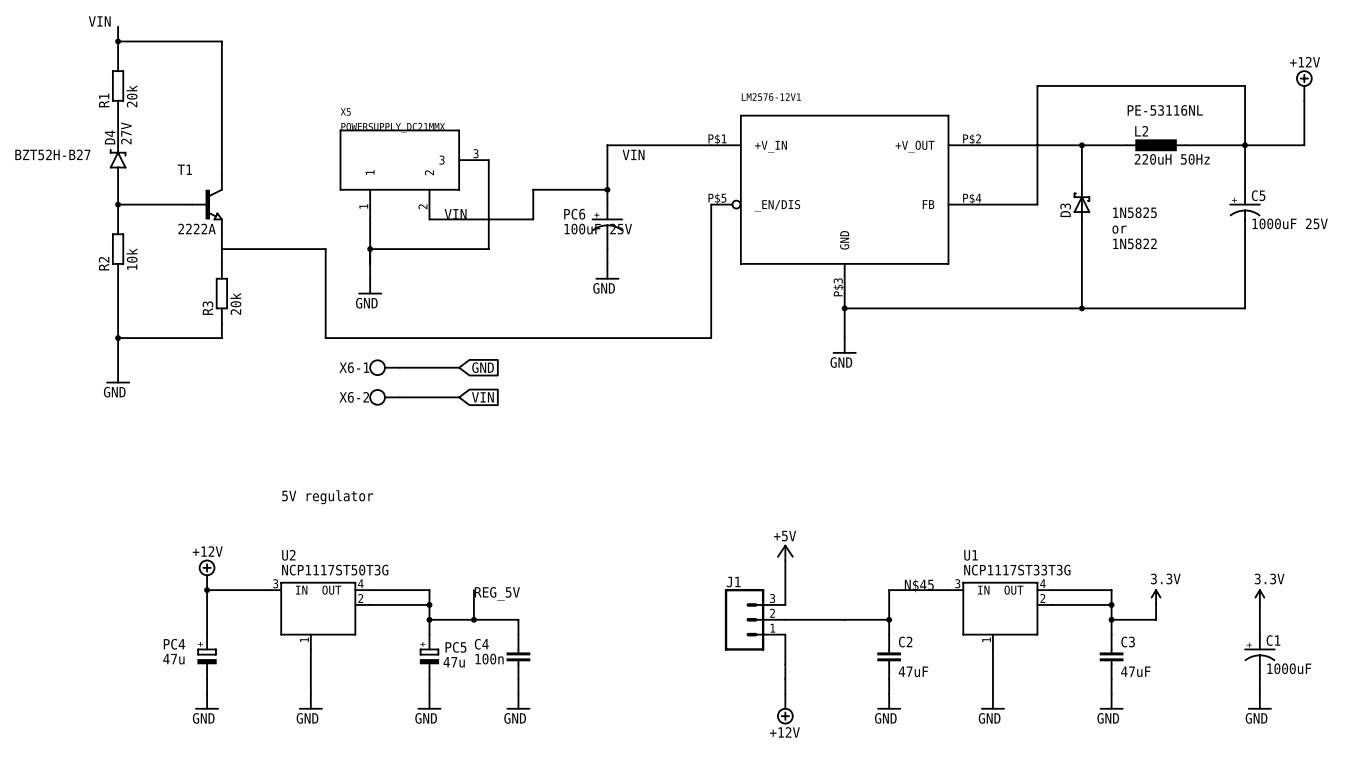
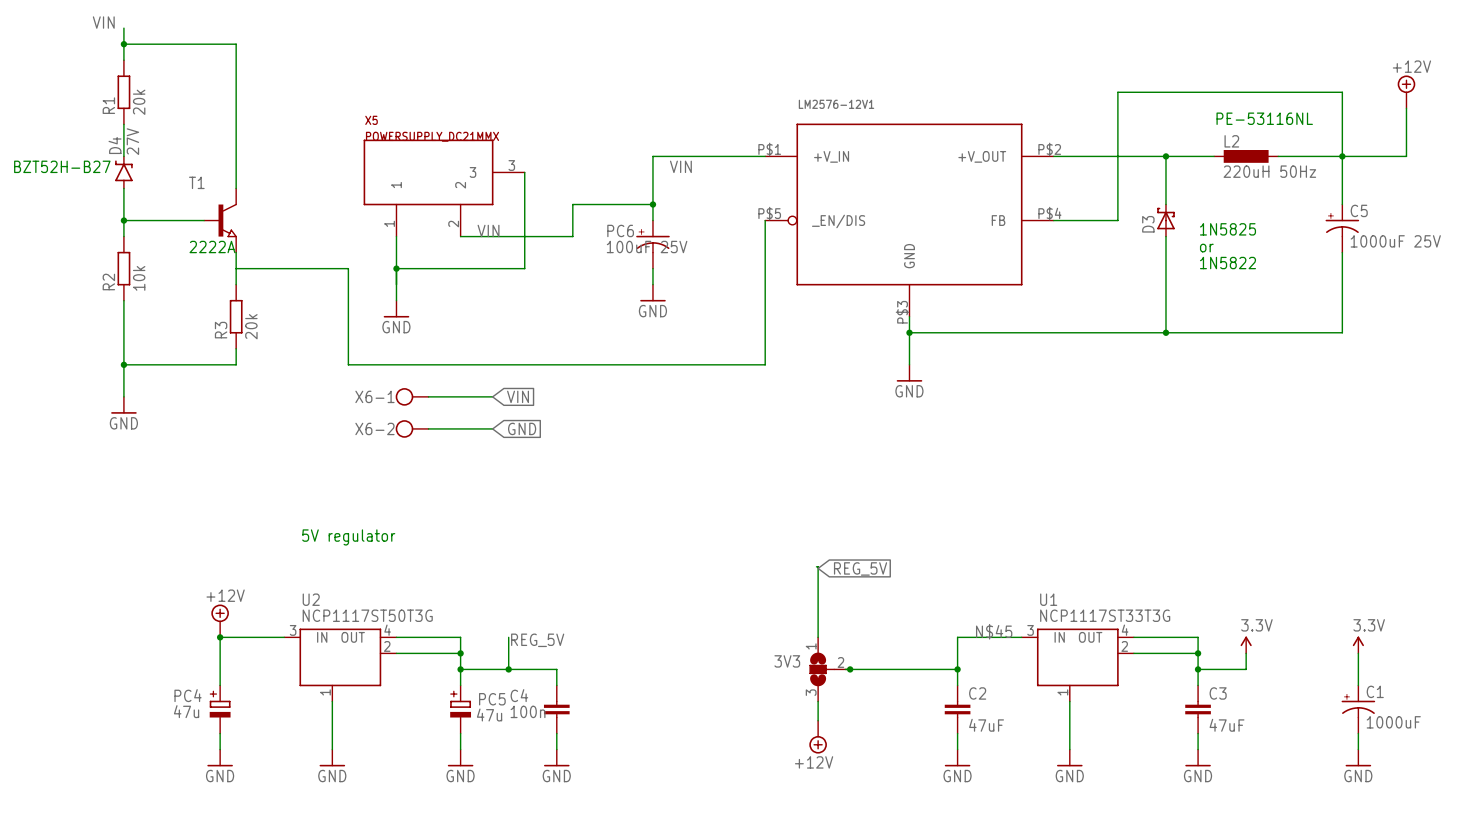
global label: GND (483, 367) -> VIN (518, 396)
global label: VIN (482, 397) -> GND (522, 428)
wire: none -> (816, 566) (818, 566) (818, 637)
global label: none -> REG_5V (860, 568)
power symbol: +5V (785, 552) -> none
wire: (785, 560) (785, 604) -> none
J1: (755, 619) -> none
3V3: none -> (829, 669)
junction: none -> (850, 669)
wire: (785, 634) (785, 693) -> none
wire: none -> (818, 701) (818, 720)
power symbol position: +12V (785, 709) -> +12V (818, 737)

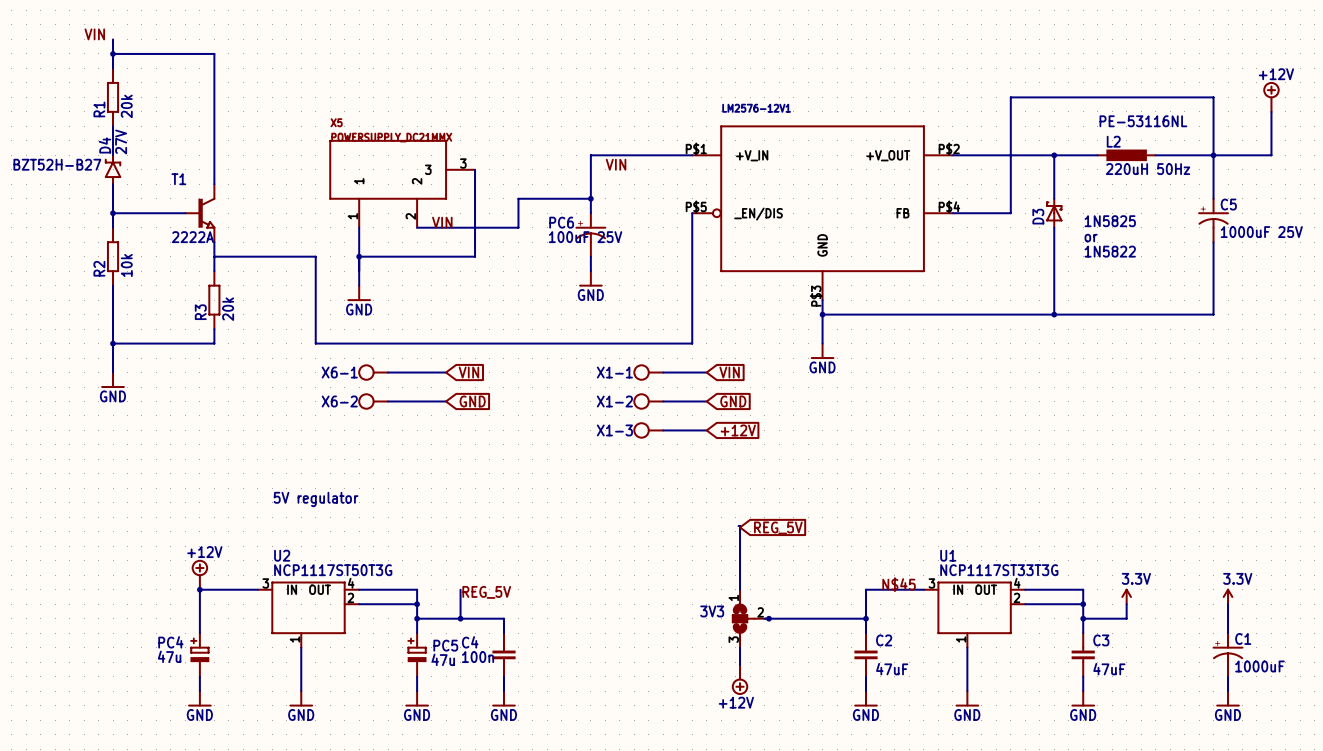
X1-1: none -> (648, 372)
wire: none -> (663, 372) (706, 372)
global label: none -> VIN (729, 372)
X1-2: none -> (648, 401)
wire: none -> (663, 401) (706, 401)
global label: none -> GND (733, 401)
X1-3: none -> (648, 430)
wire: none -> (663, 430) (706, 430)
global label: none -> +12V (738, 430)

